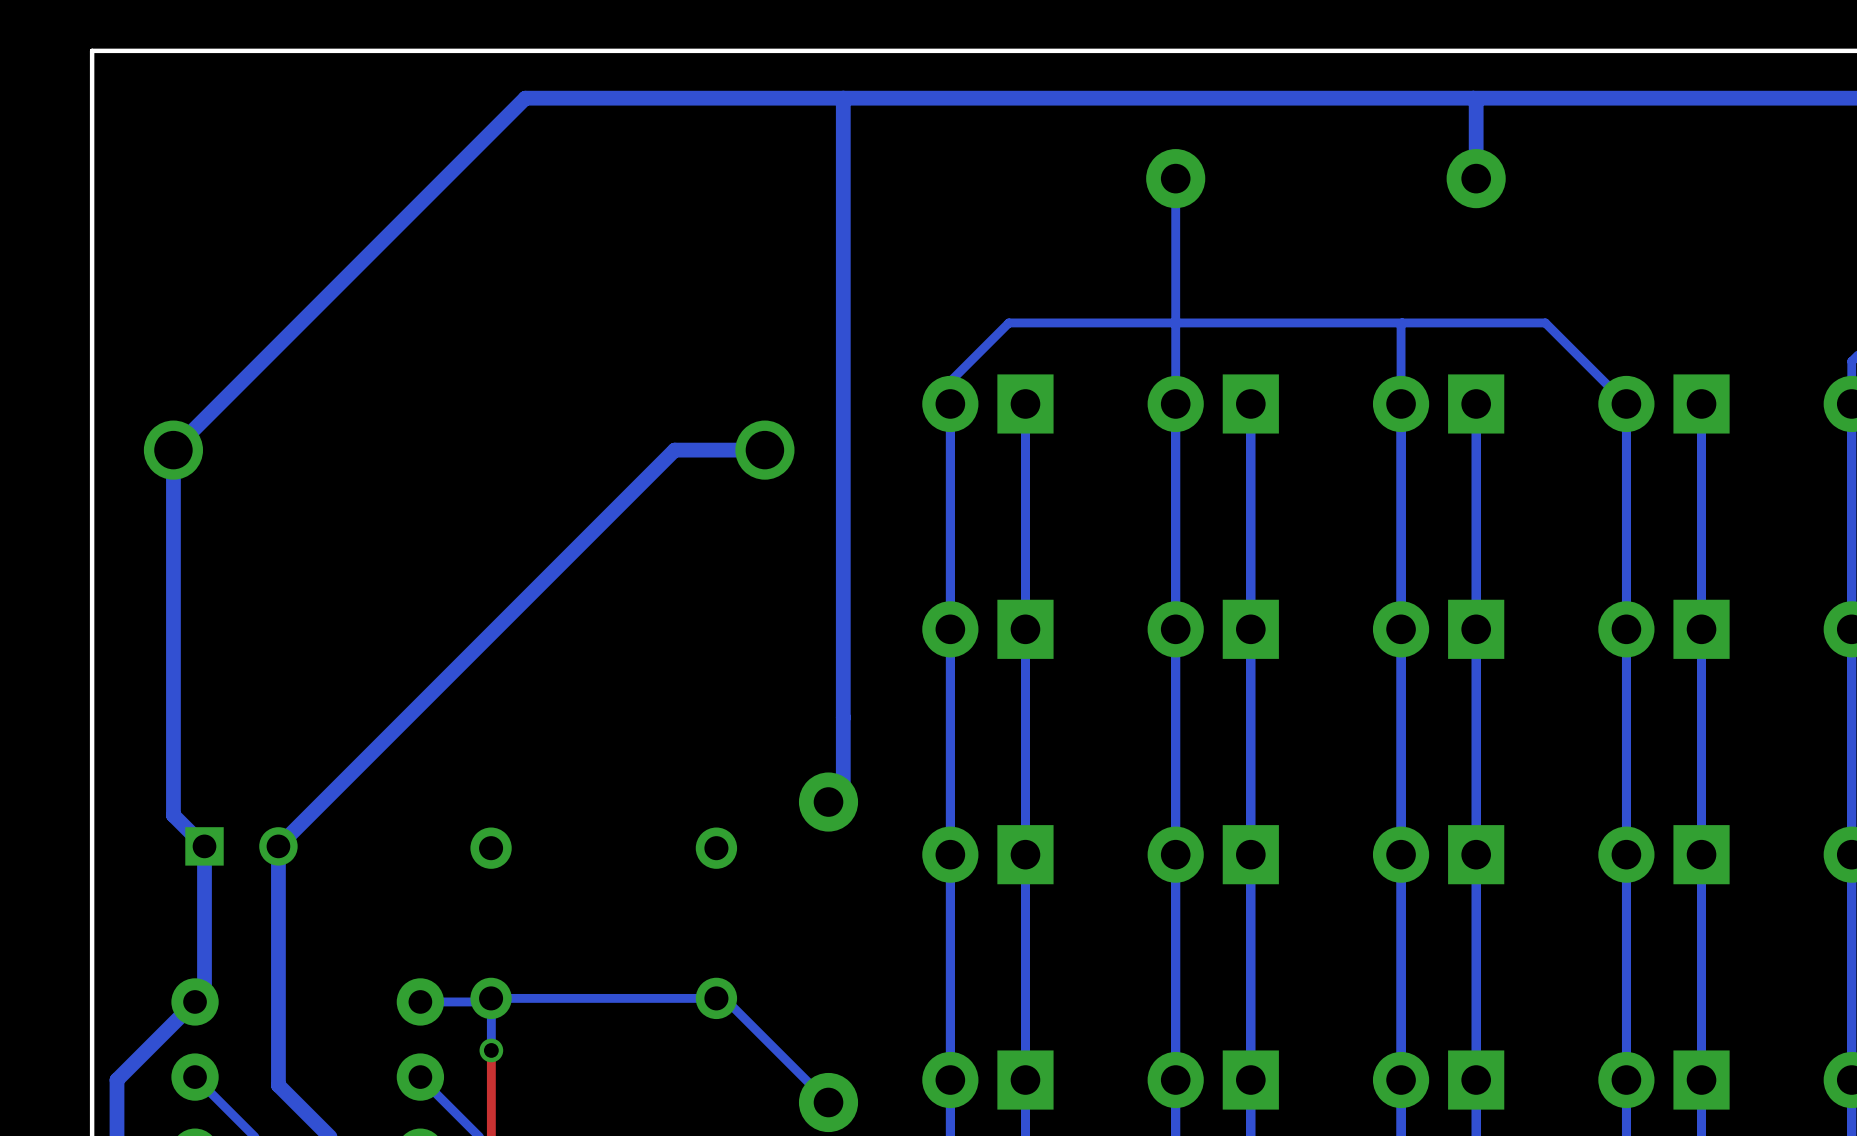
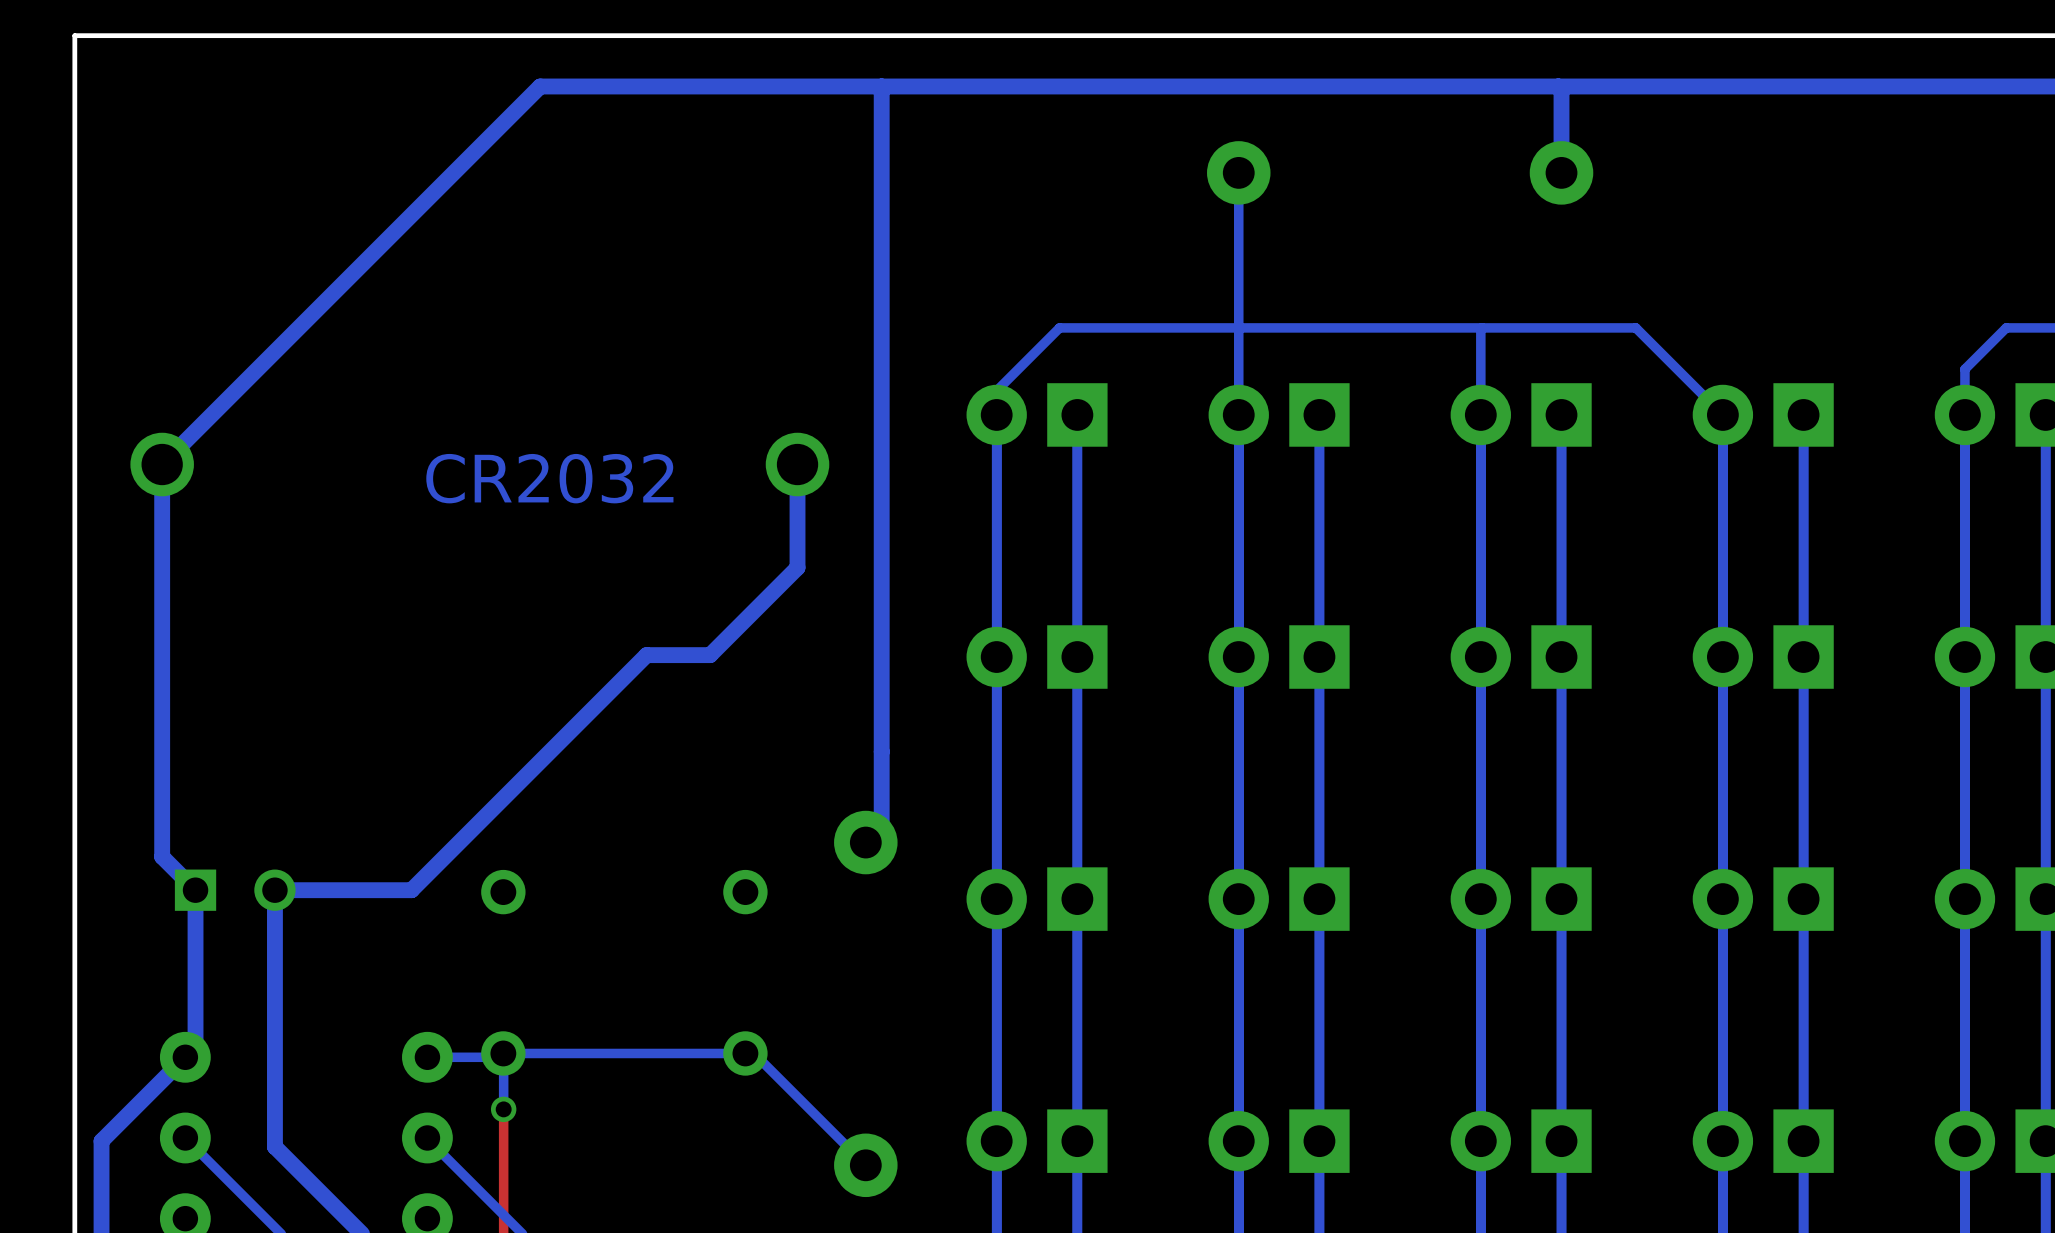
bottom track: (764, 450) (674, 450) (278, 846) -> (797, 464) (797, 567) (710, 655) (646, 655) (411, 890) (274, 890)
text: none -> CR2032 (549, 478)

